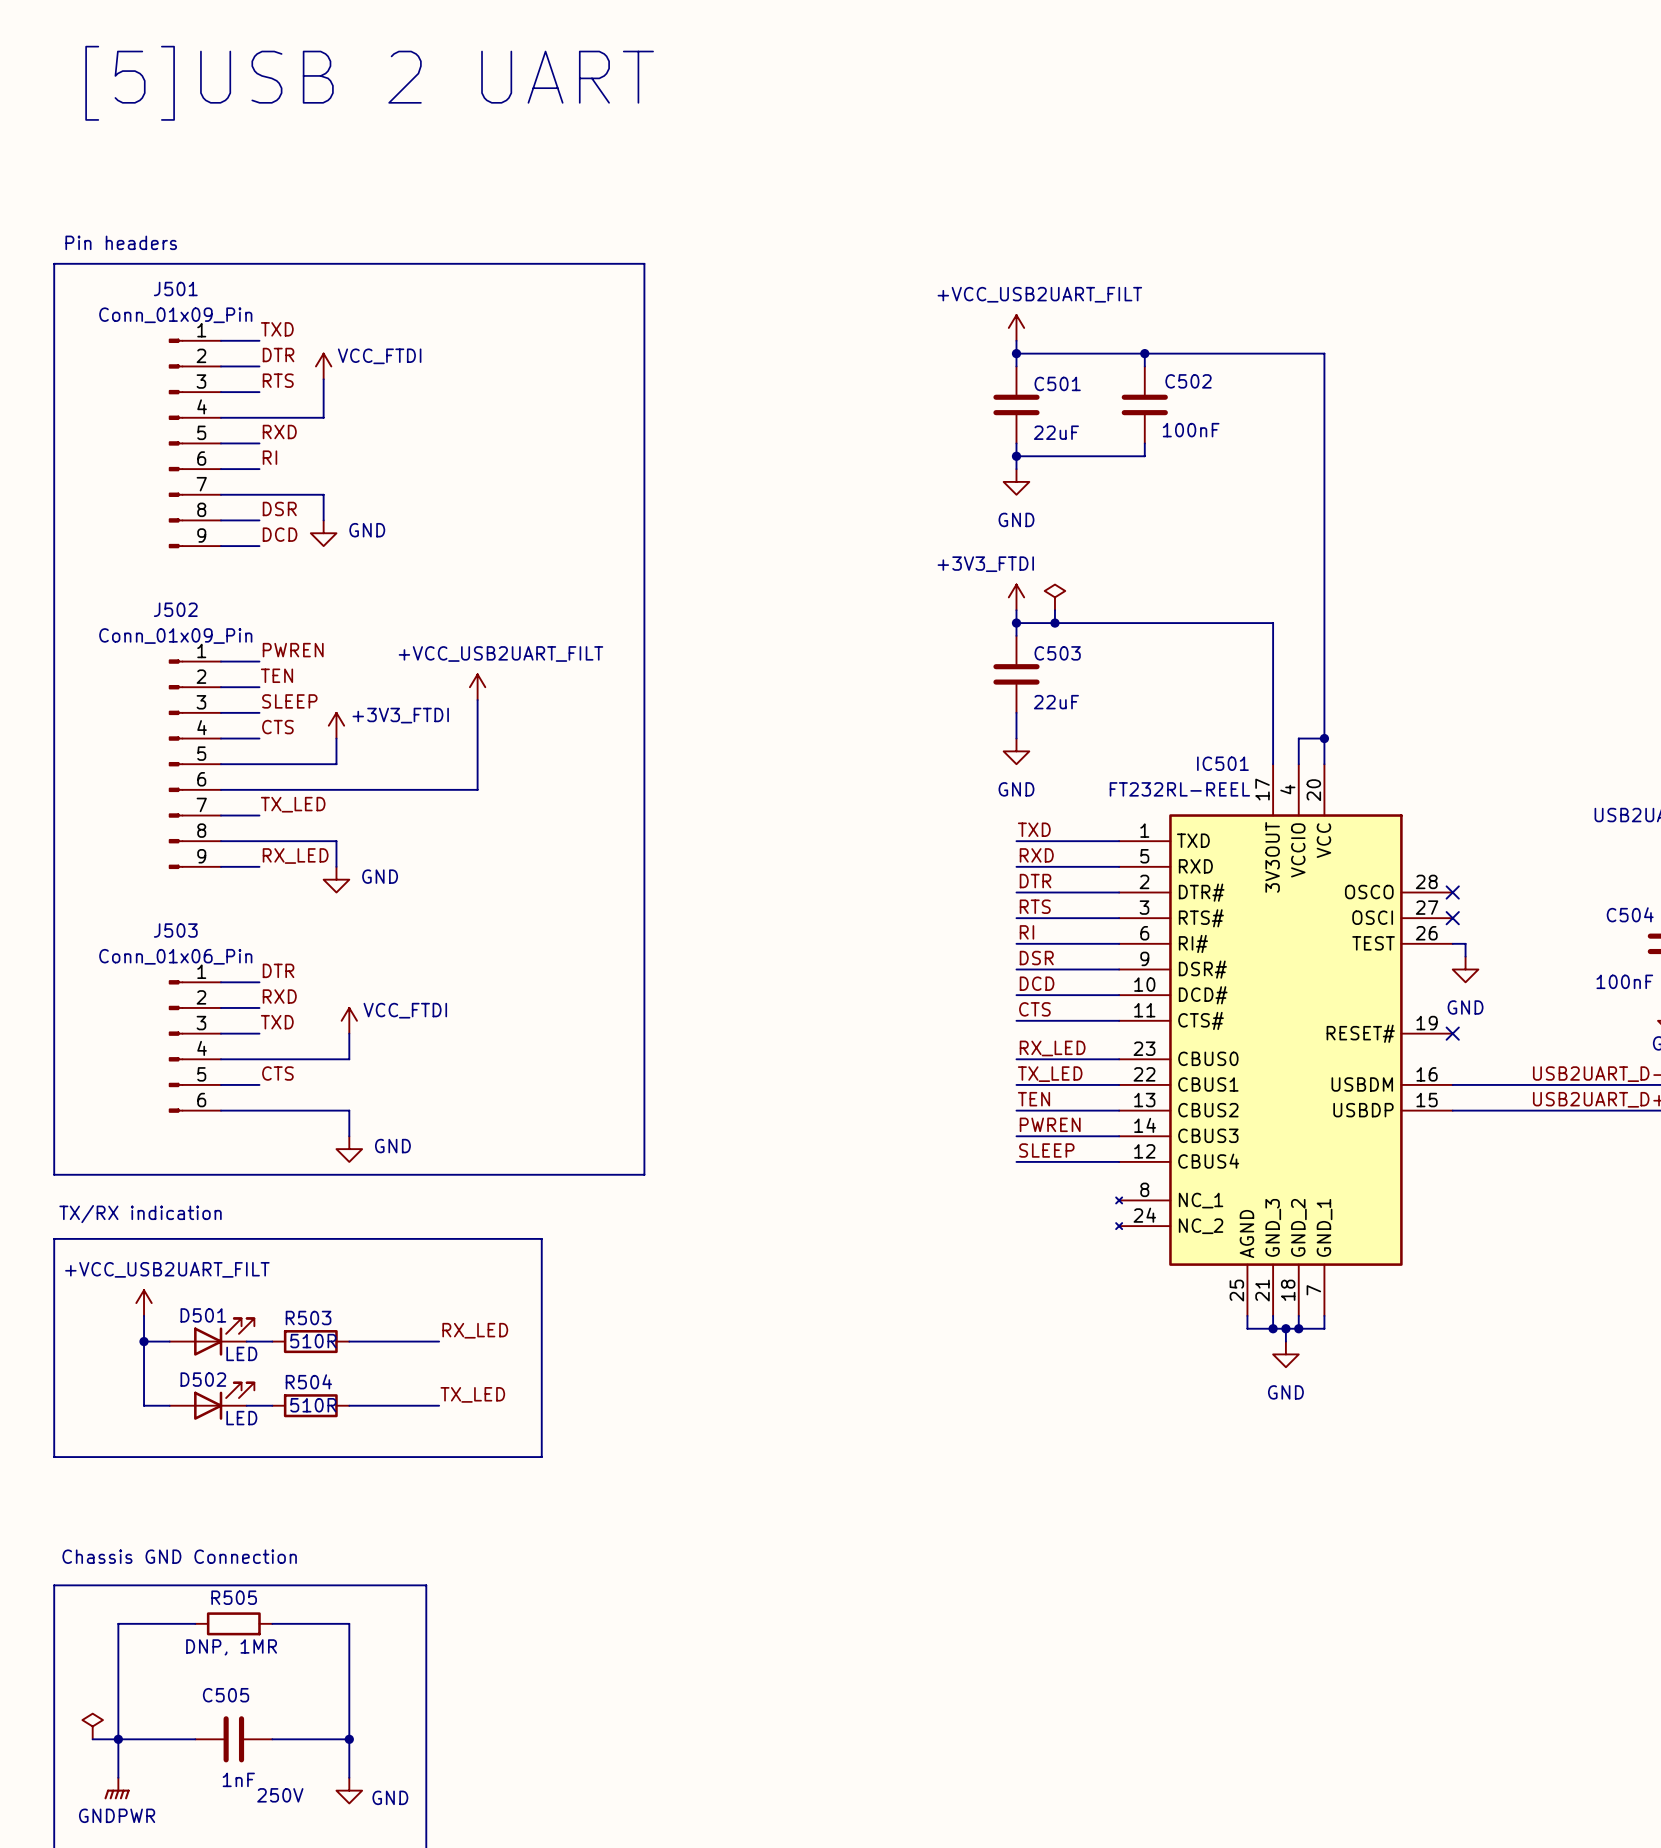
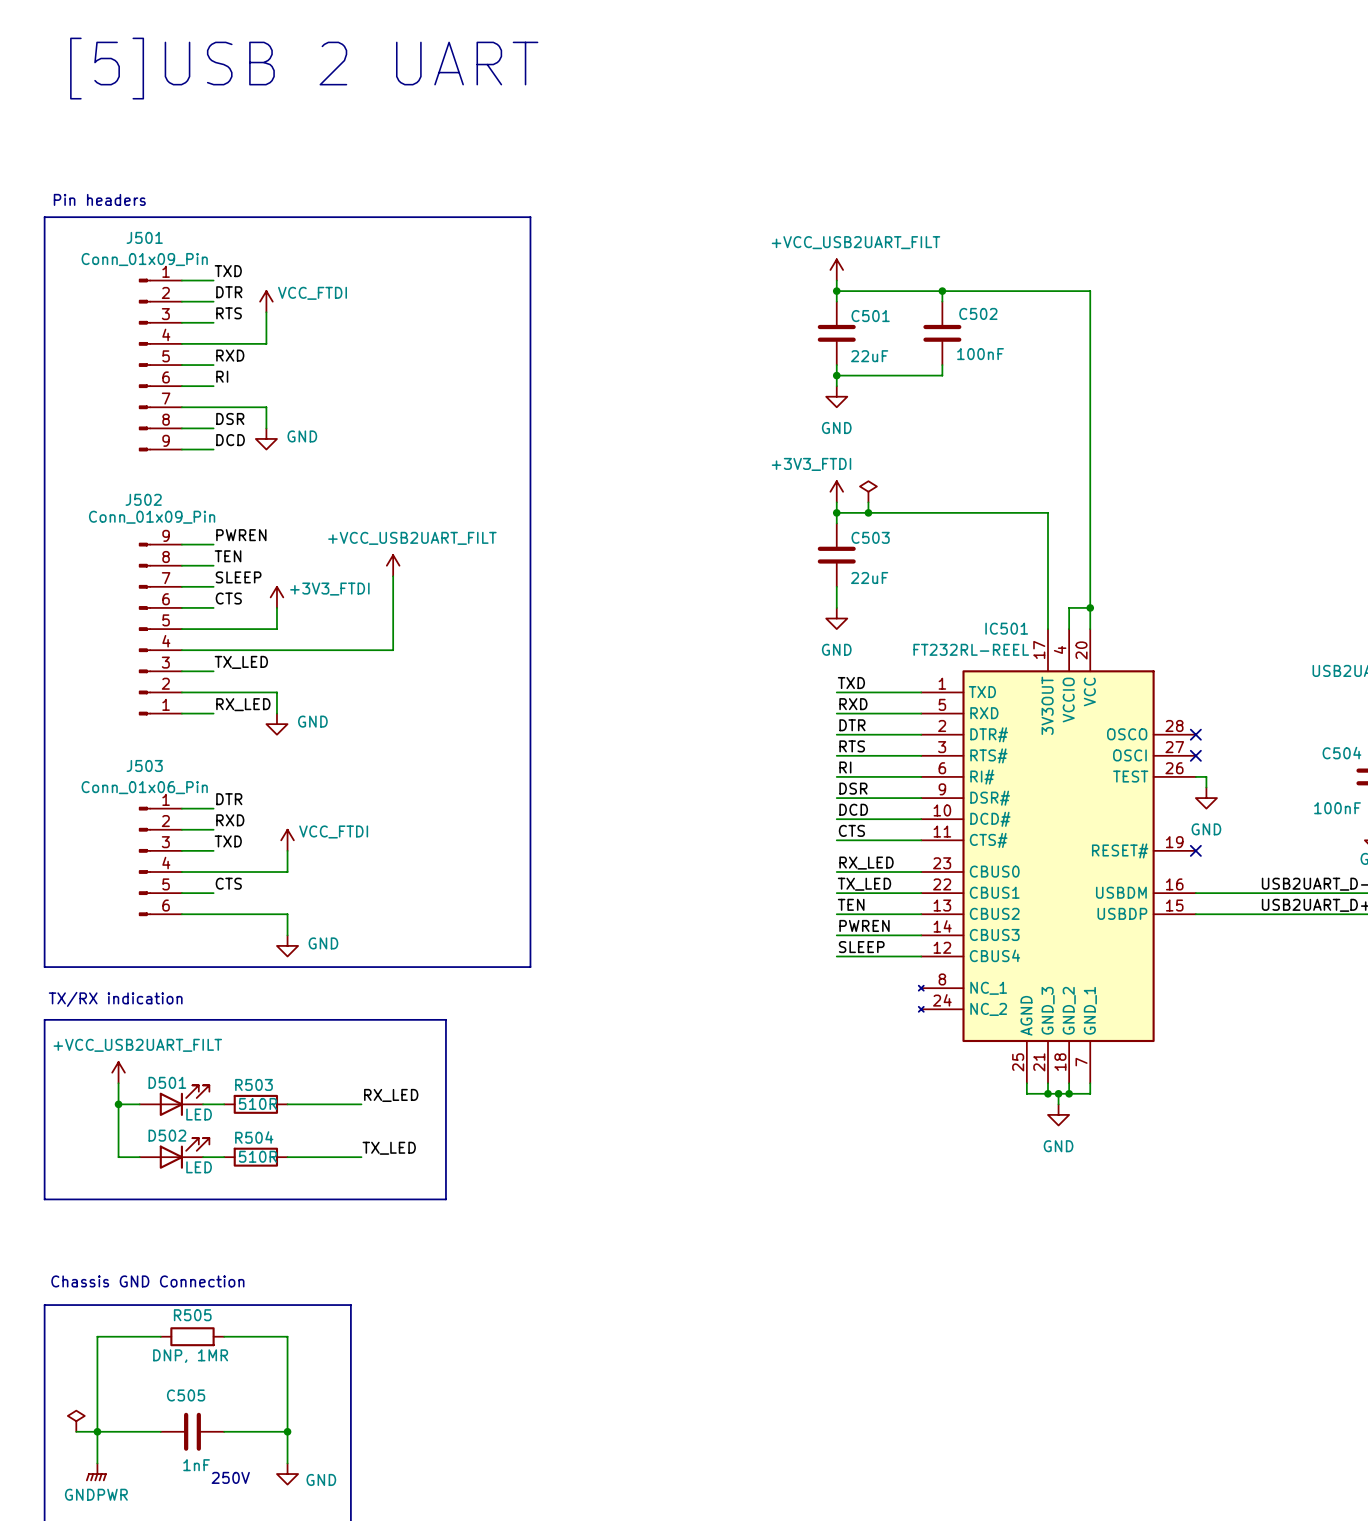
J502 flip: as is (176, 764) -> up-down (144, 629)

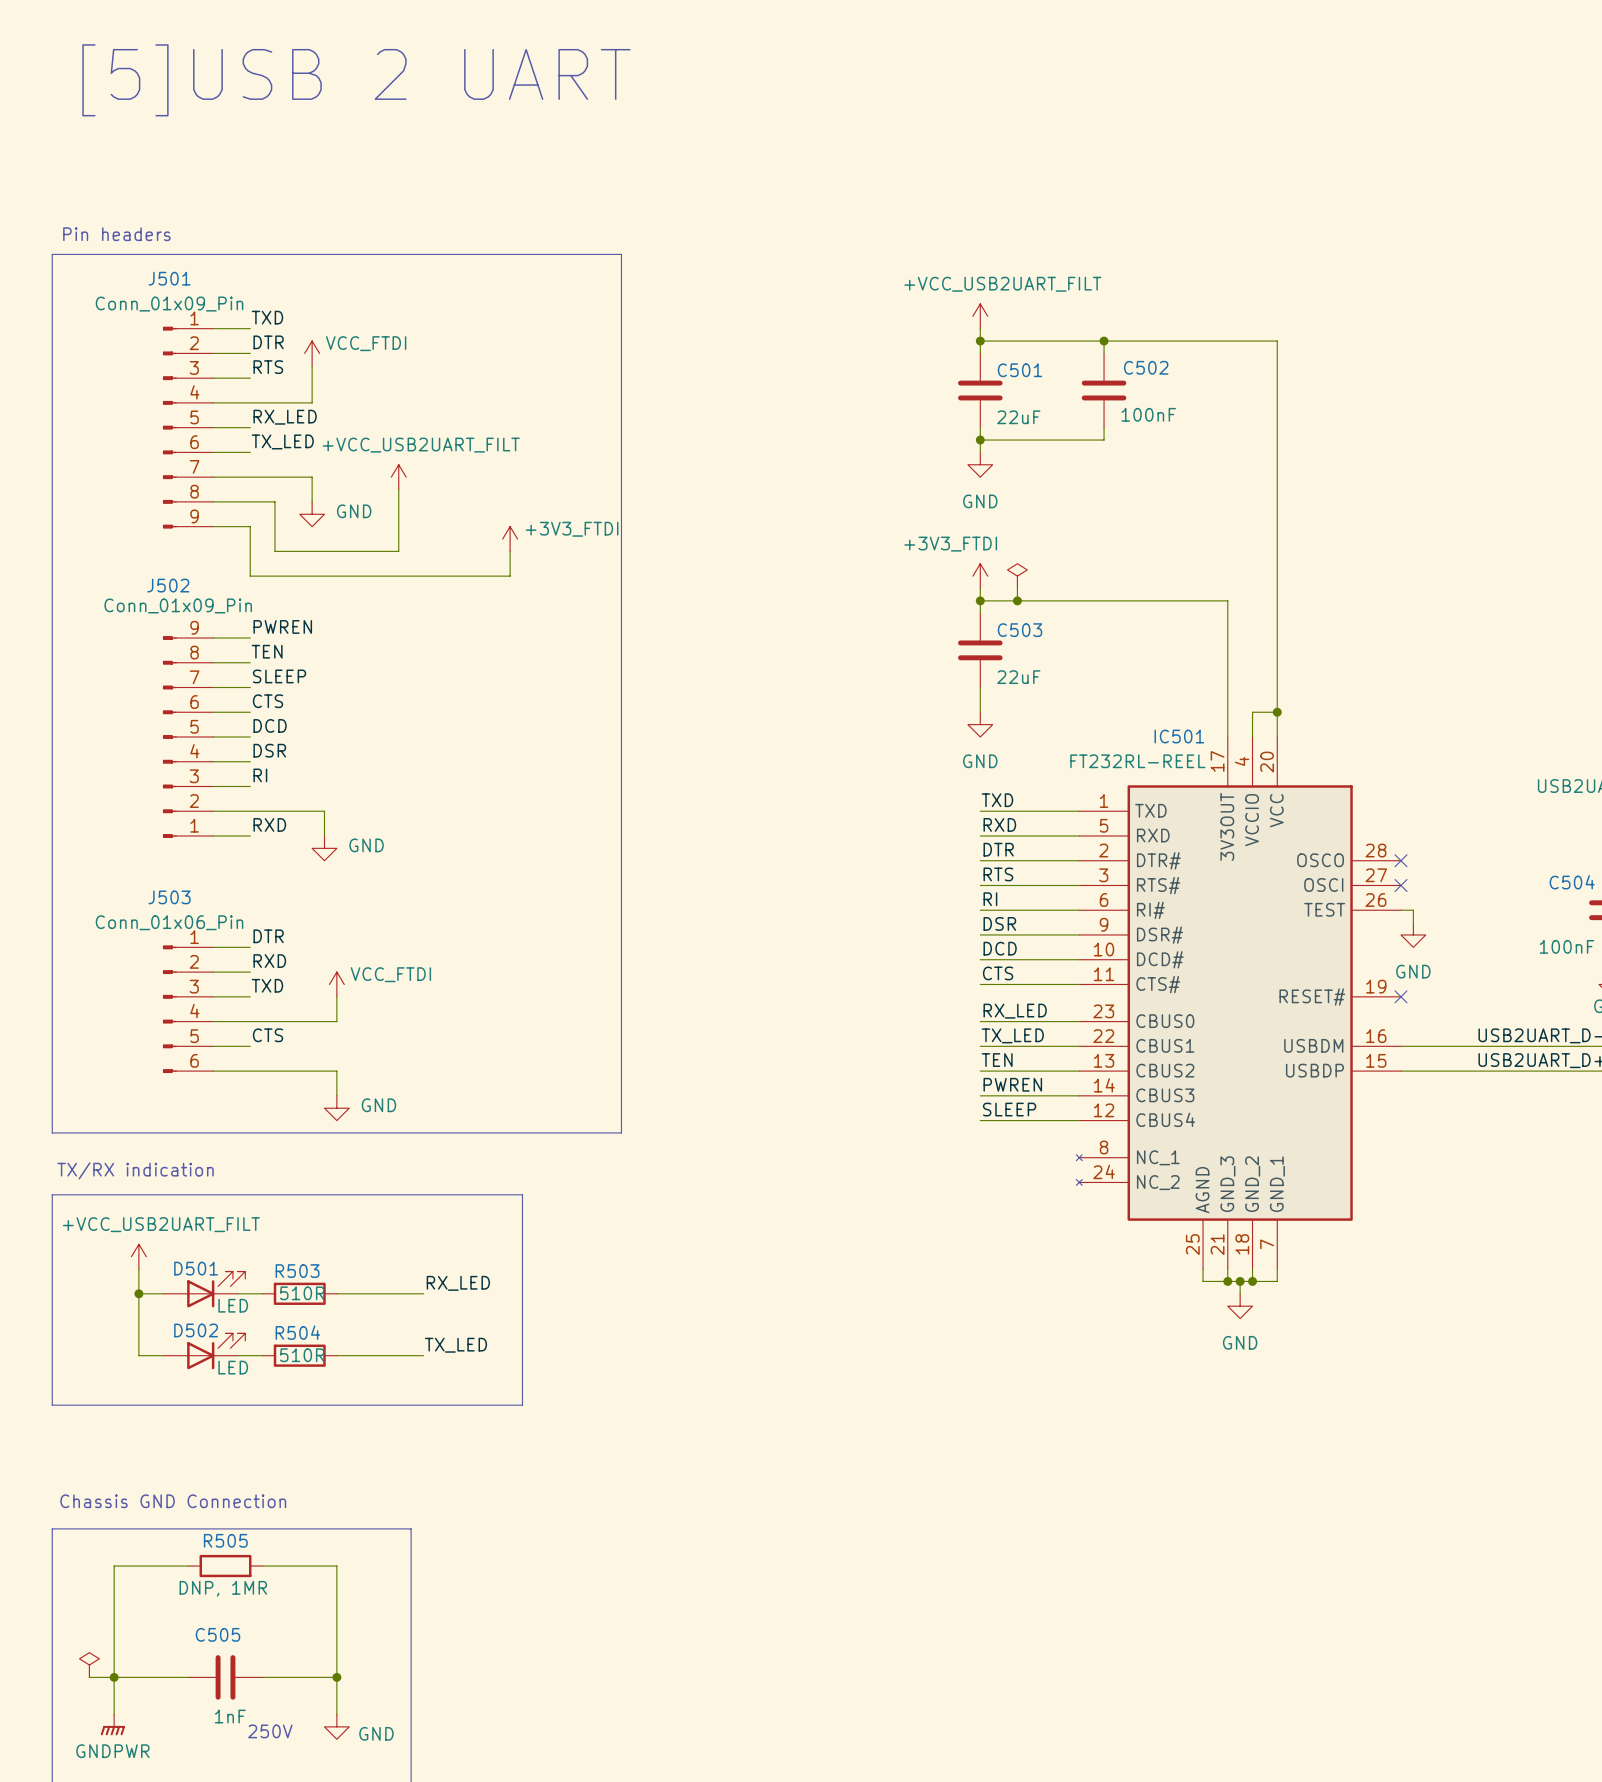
label: RXD (230, 355) -> RX_LED (285, 417)
label: RI (222, 376) -> TX_LED (282, 441)
wire: none -> (398, 489) (398, 551) (275, 551) (275, 501) (250, 501)
label: DSR (230, 418) -> none
label position: DCD (230, 440) -> DCD (270, 725)
wire: none -> (250, 526) (250, 576) (510, 576) (510, 551)
power symbol: none -> +3V3_FTDI (510, 539)
power symbol position: +VCC_USB2UART_FILT (393, 565) -> +VCC_USB2UART_FILT (398, 477)
wire: (393, 576) (393, 650) (213, 650) -> none
power symbol: +3V3_FTDI (276, 597) -> none
wire: (276, 607) (276, 629) (213, 629) -> none
label: none -> DSR (269, 750)
label: TX_LED (241, 662) -> RI (260, 775)
label: RX_LED (243, 704) -> RXD (269, 824)

